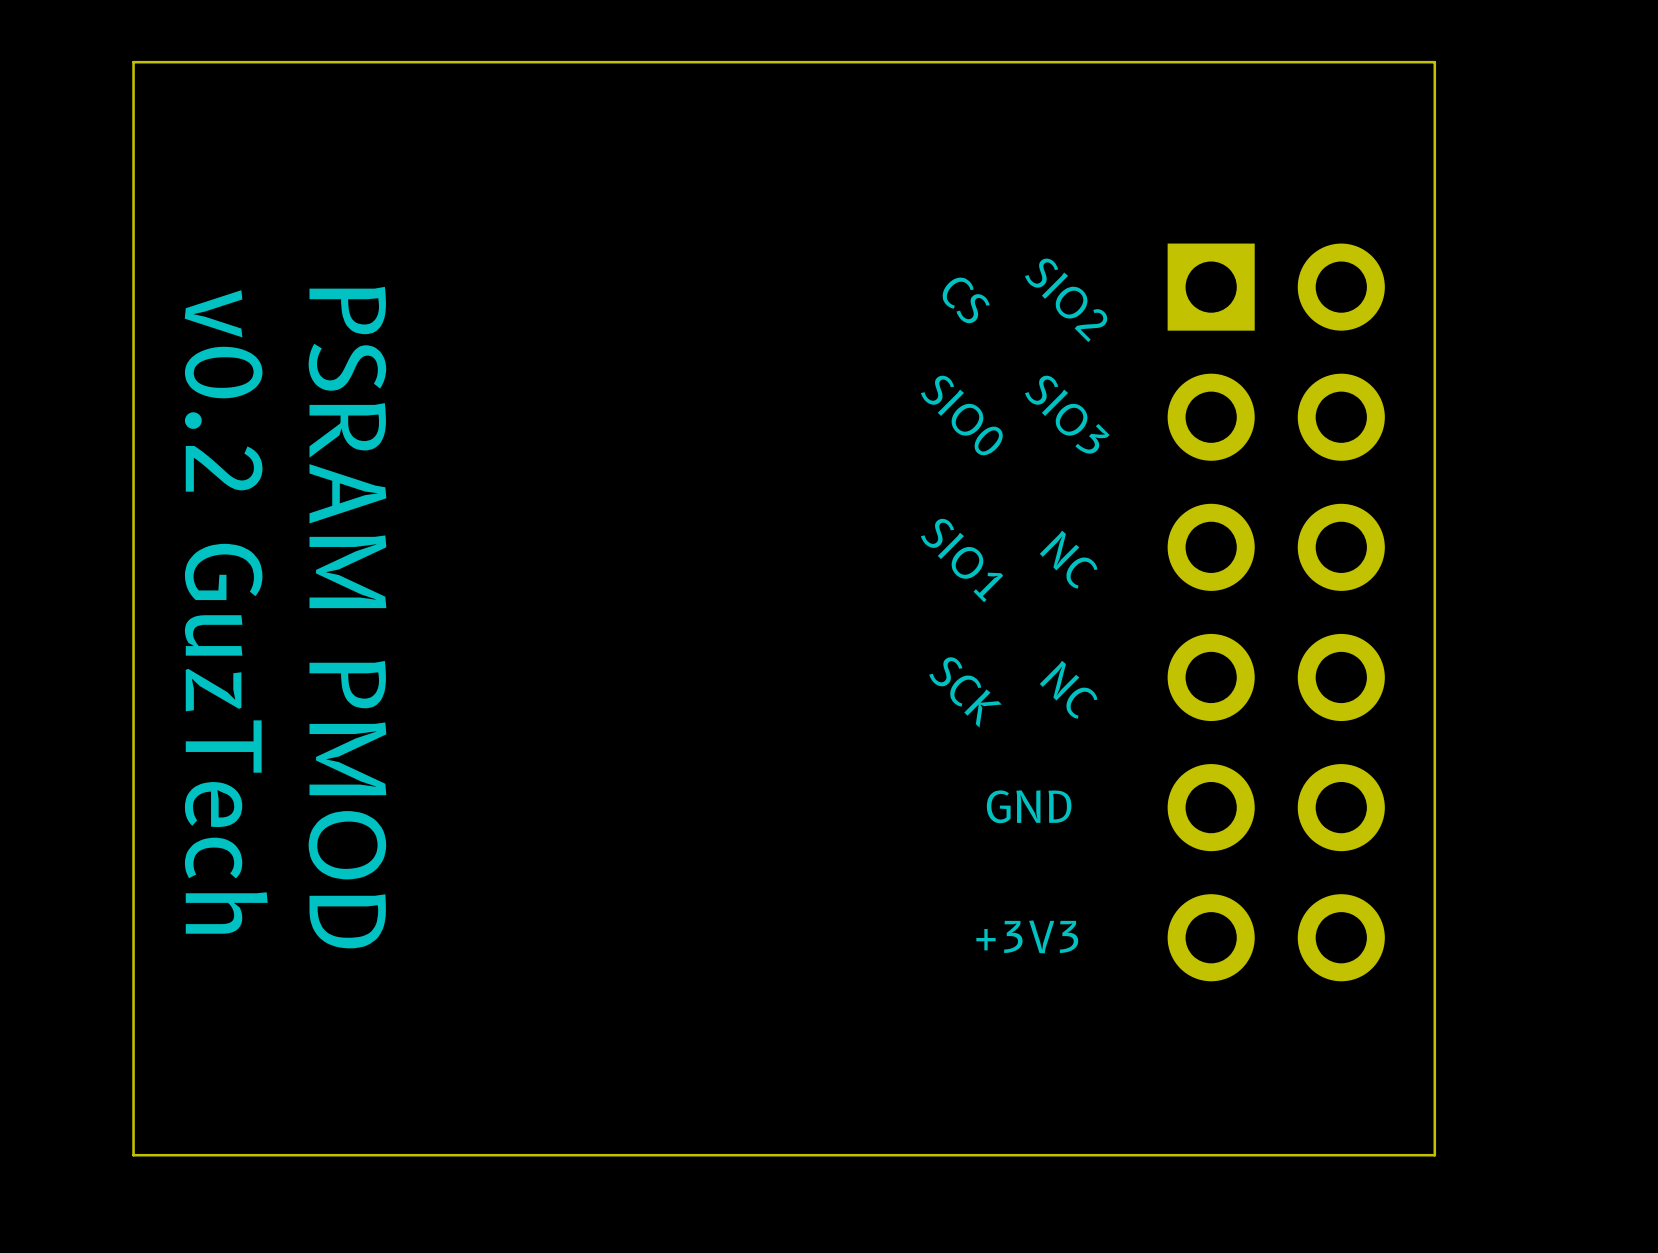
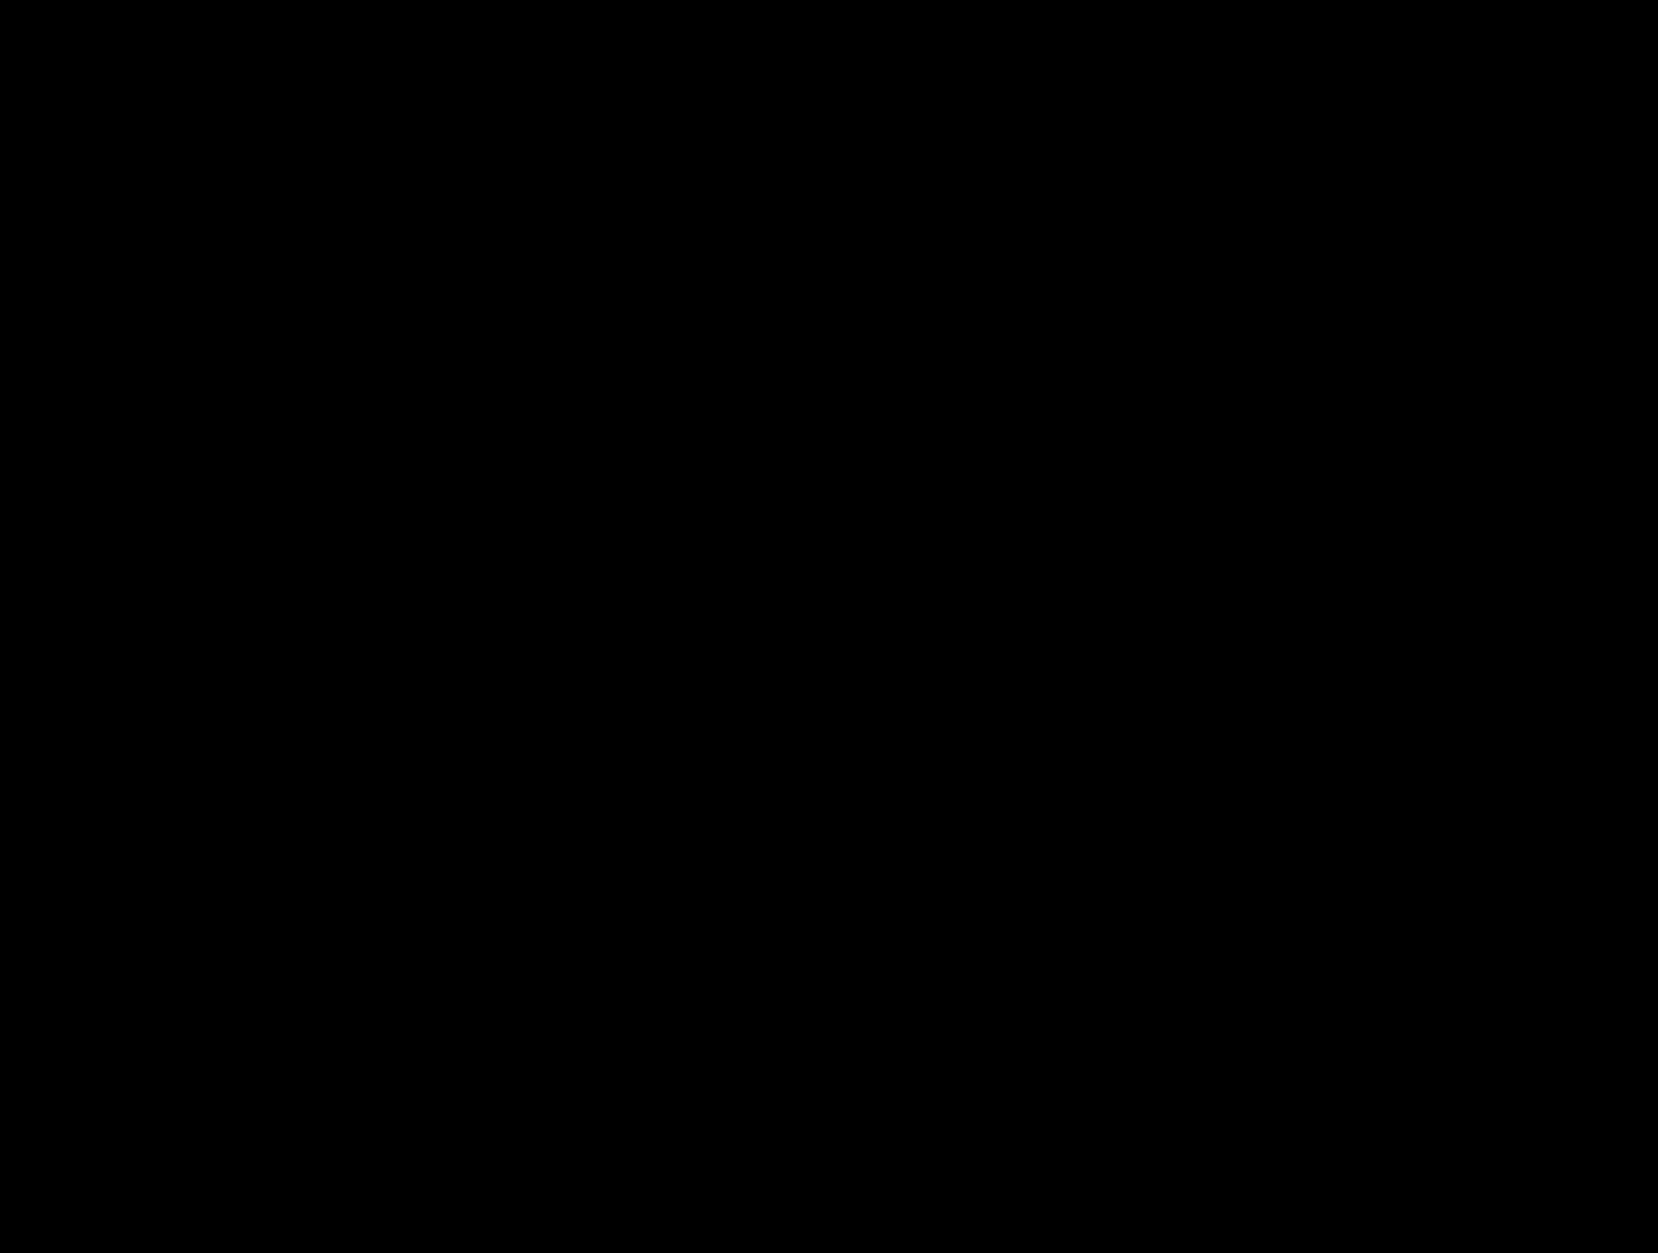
board edge: (1434, 62) (133, 62) (133, 1155) (1434, 1155) (1434, 62) -> none
text: CS (966, 300) -> none
text: SIO2 (1066, 300) -> none
text: SIO3 (1067, 414) -> none
text: SIO0 (961, 415) -> none
text: NC (1068, 559) -> none
text: SIO1 (962, 560) -> none
text: v0.2 GuzTech (226, 611) -> none
part: (1276, 612) -> none
text: PSRAM PMOD (347, 617) -> none
text: NC (1068, 689) -> none
text: SCK (965, 692) -> none
text: GND (1029, 806) -> none
text: +3V3 (1027, 936) -> none

